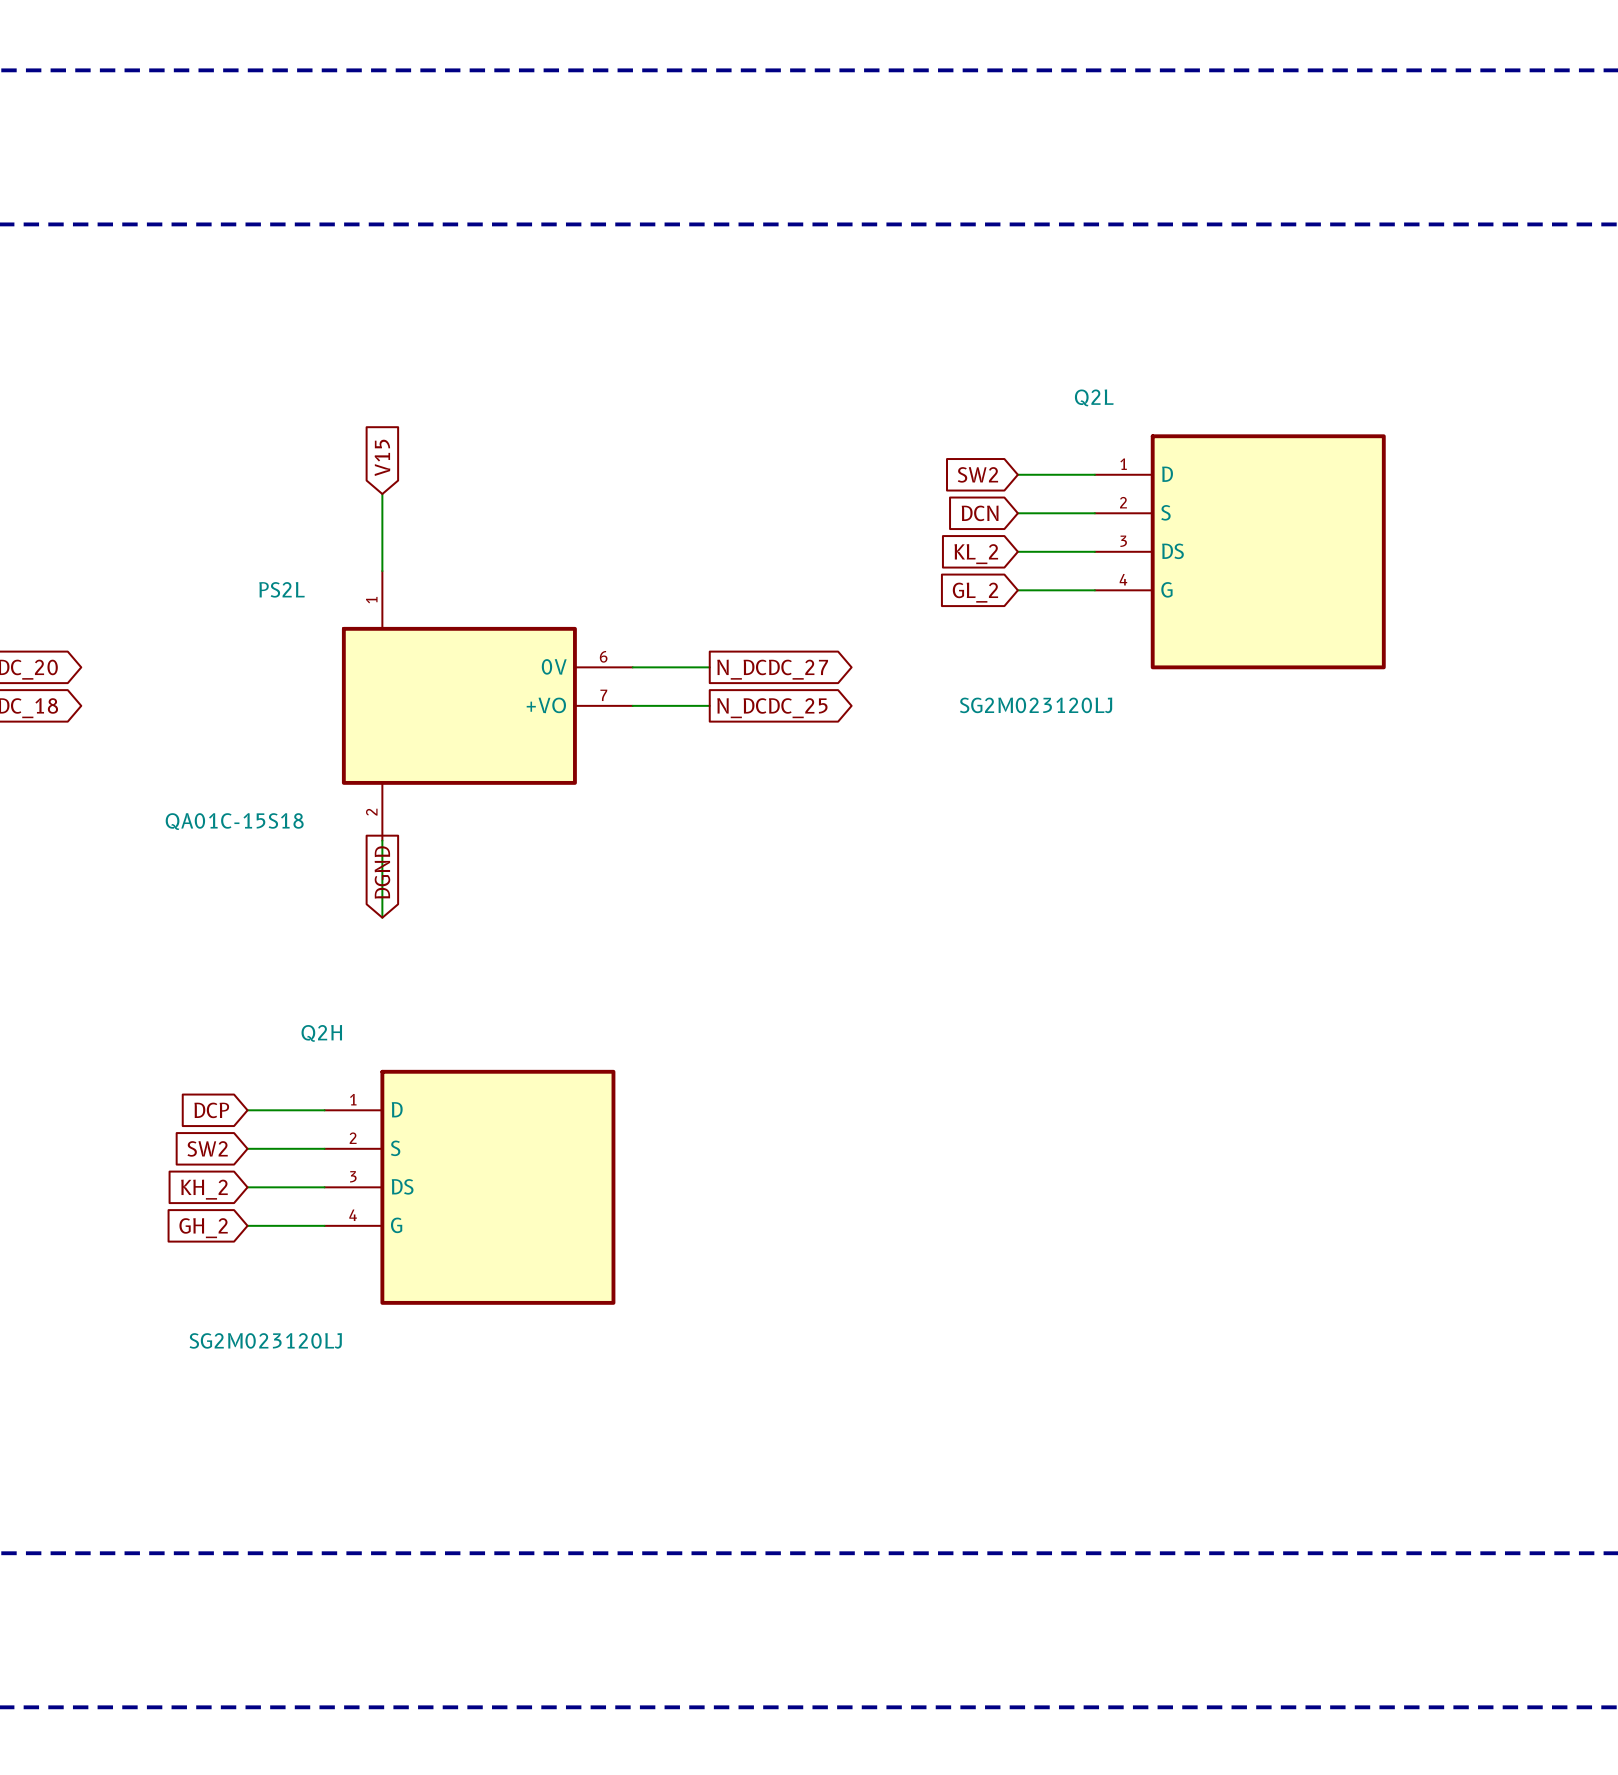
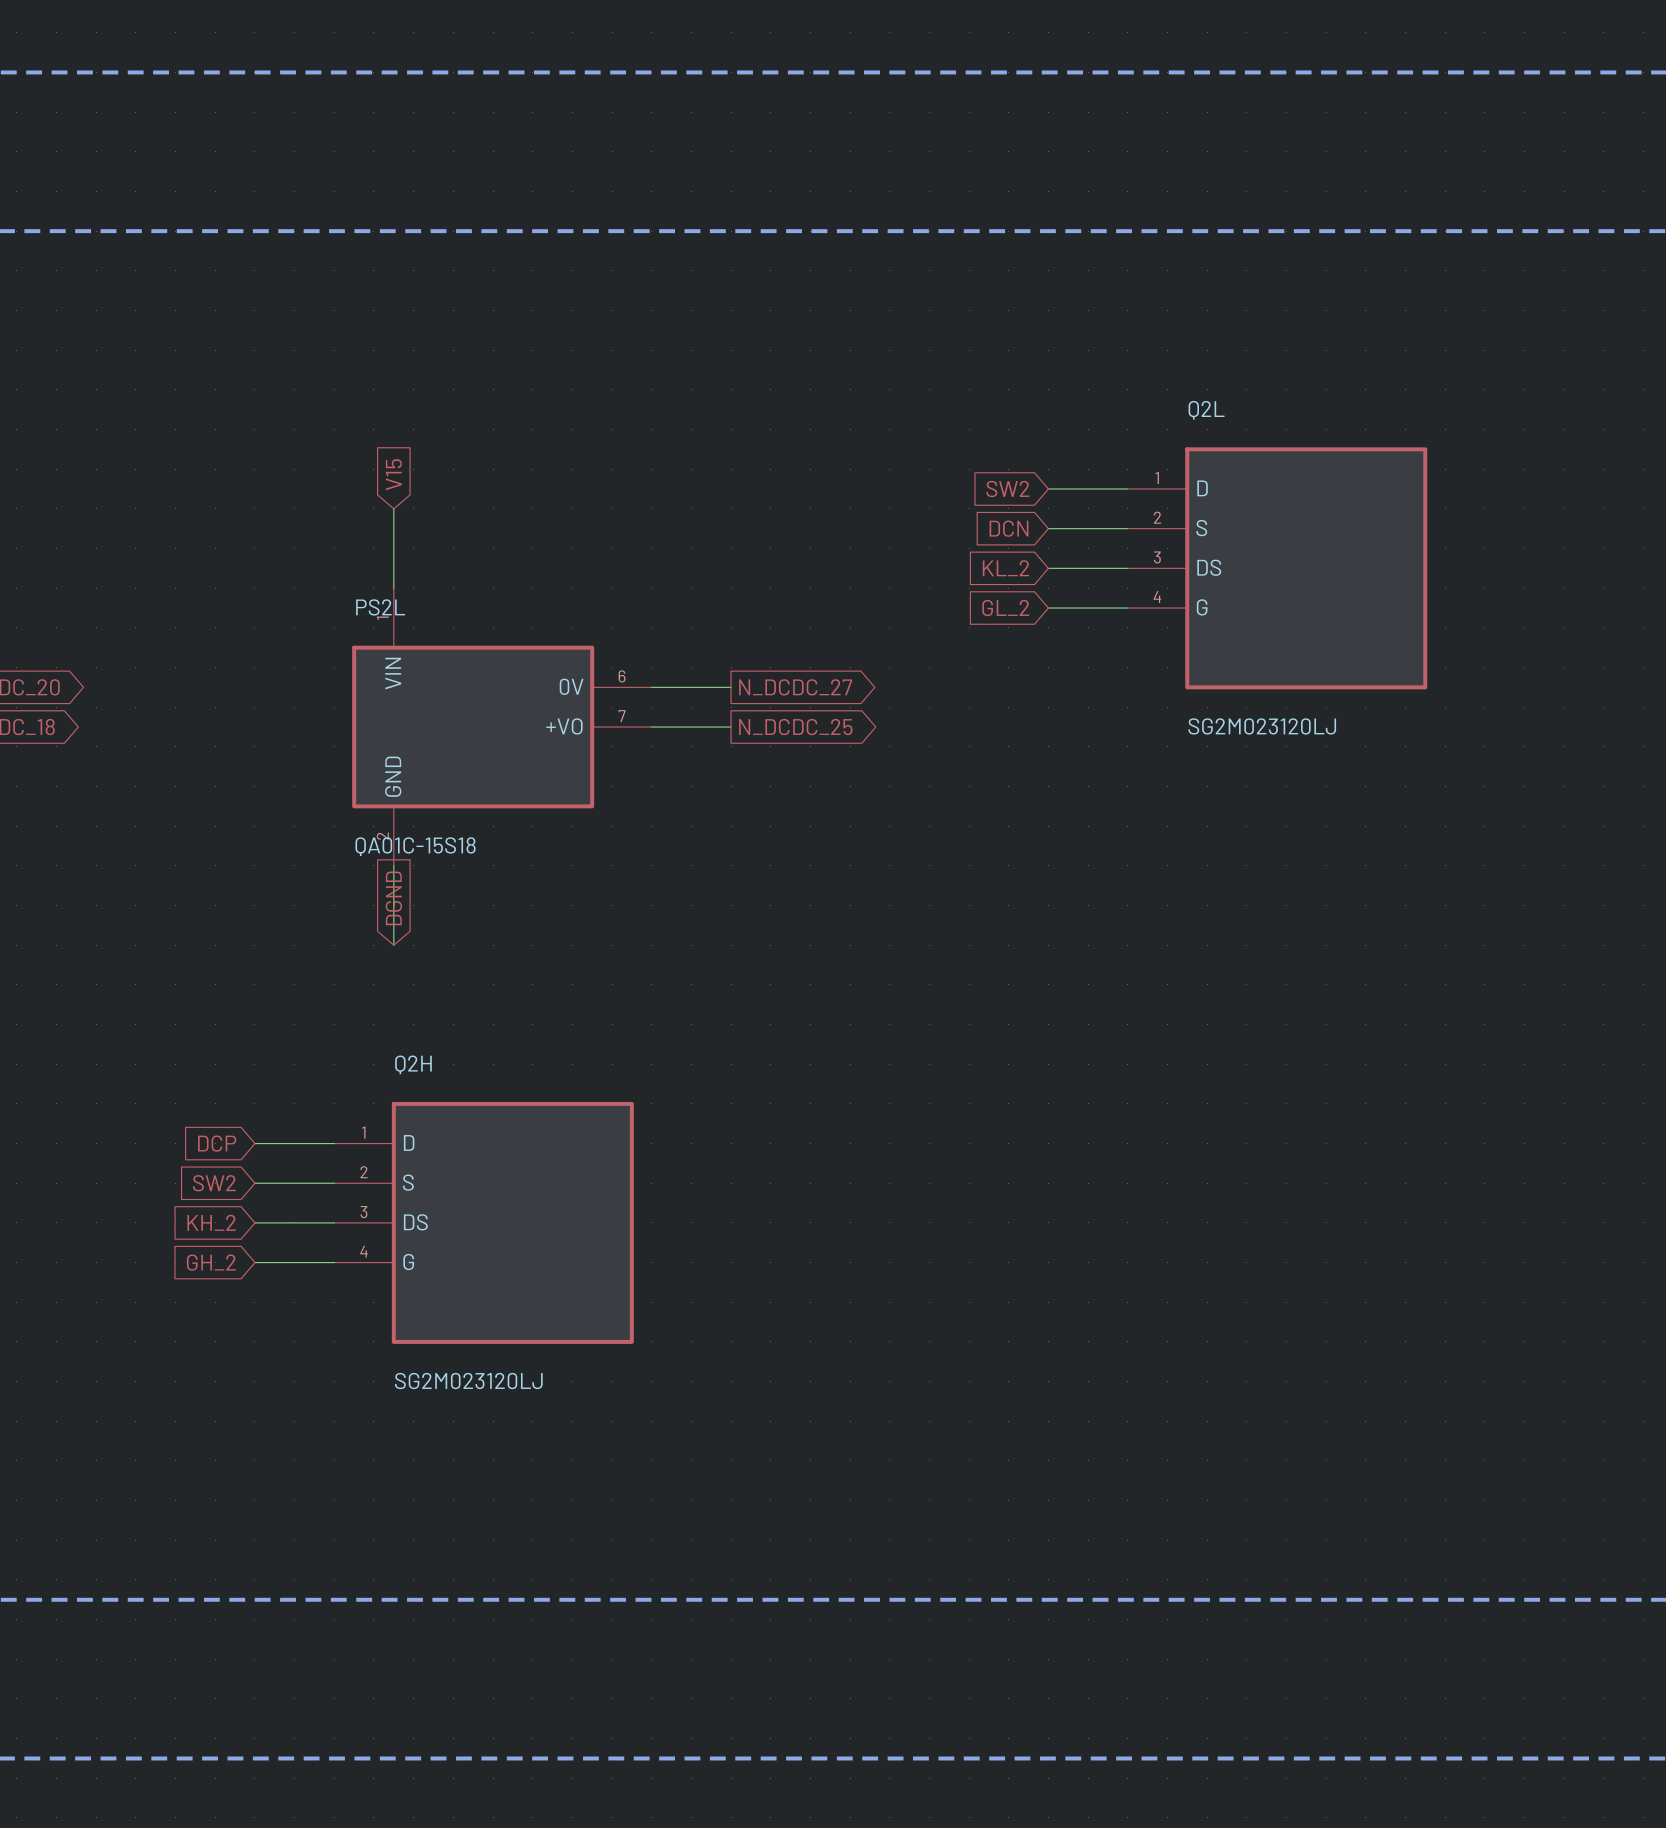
Q2L name position: Q2L (1094, 397) -> Q2L (1206, 410)
PS2L name position: PS2L (281, 589) -> PS2L (380, 607)
PS2L pin name: none -> VIN (393, 673)
Q2L value position: SG2M023120LJ (1036, 705) -> SG2M023120LJ (1262, 726)
PS2L pin name: none -> GND (393, 776)
PS2L value position: QA01C-15S18 (234, 821) -> QA01C-15S18 (415, 846)
Q2H name position: Q2H (321, 1033) -> Q2H (413, 1064)
Q2H value position: SG2M023120LJ (265, 1340) -> SG2M023120LJ (468, 1381)

